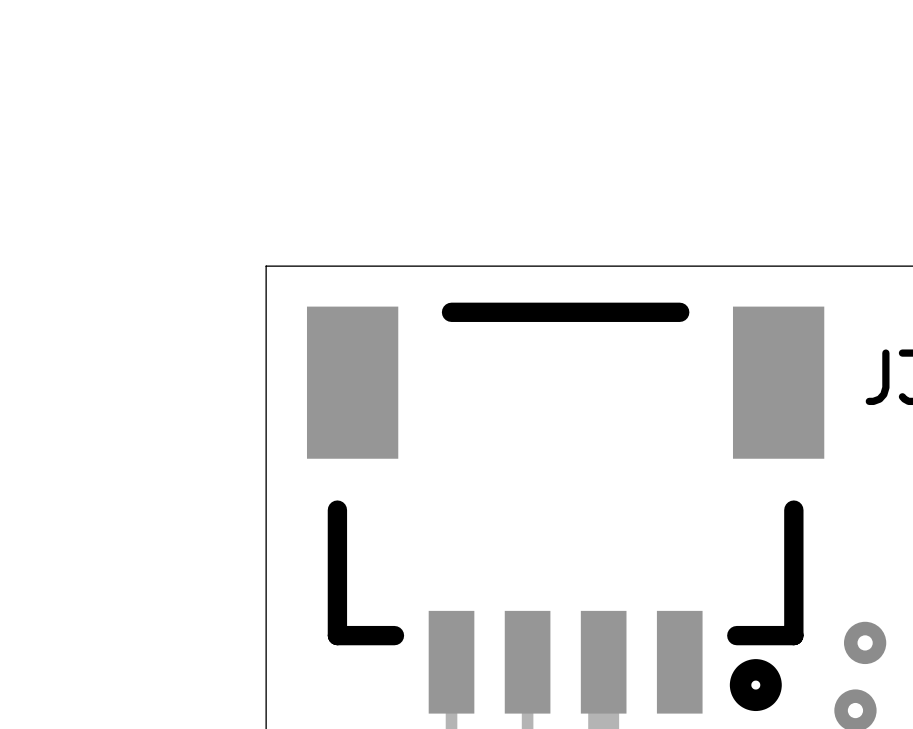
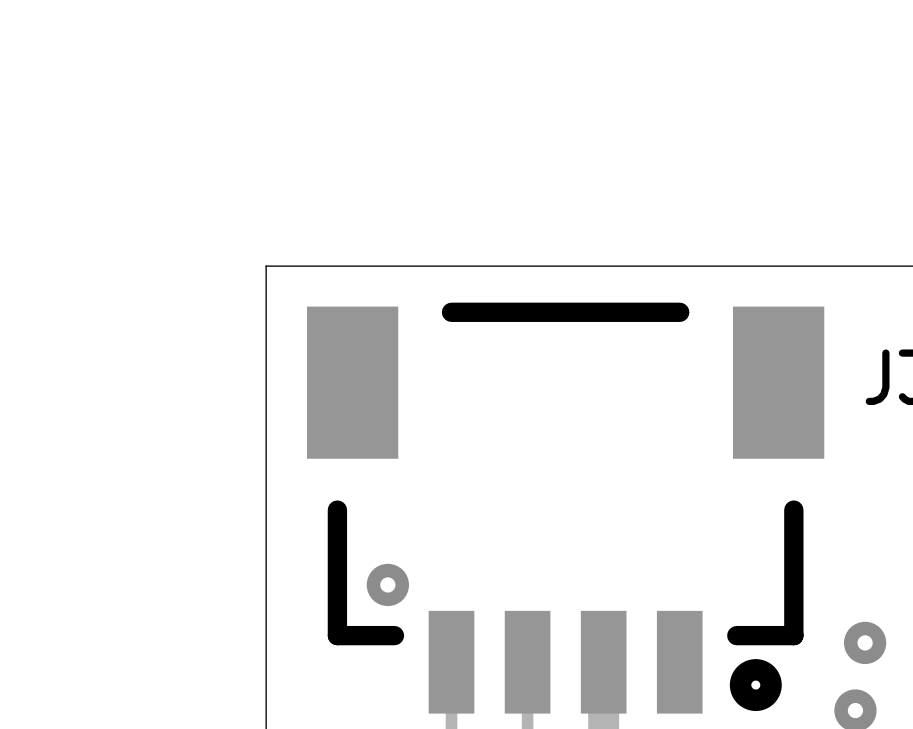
via: none -> (387, 584)

